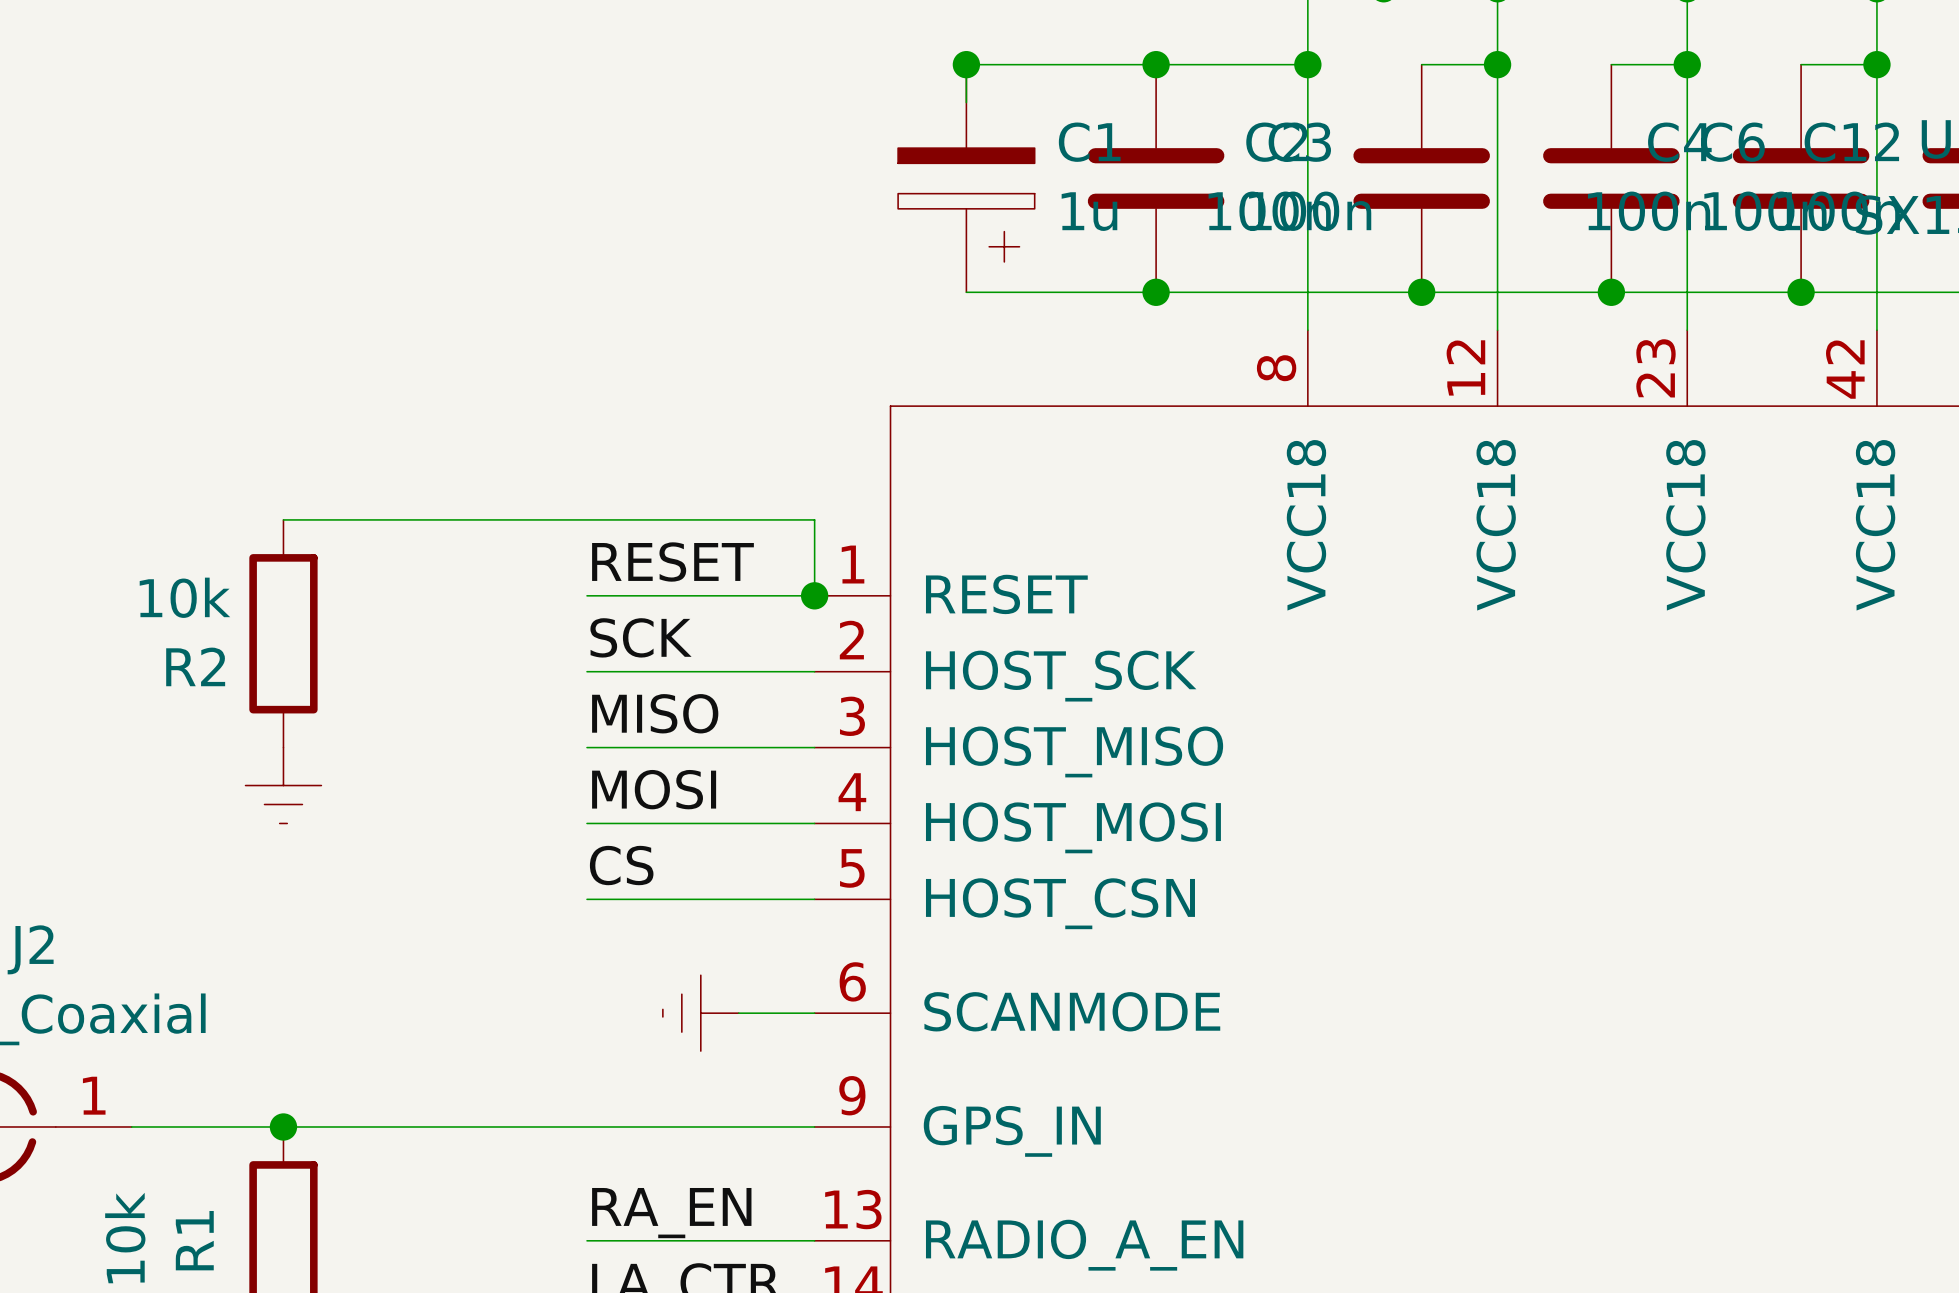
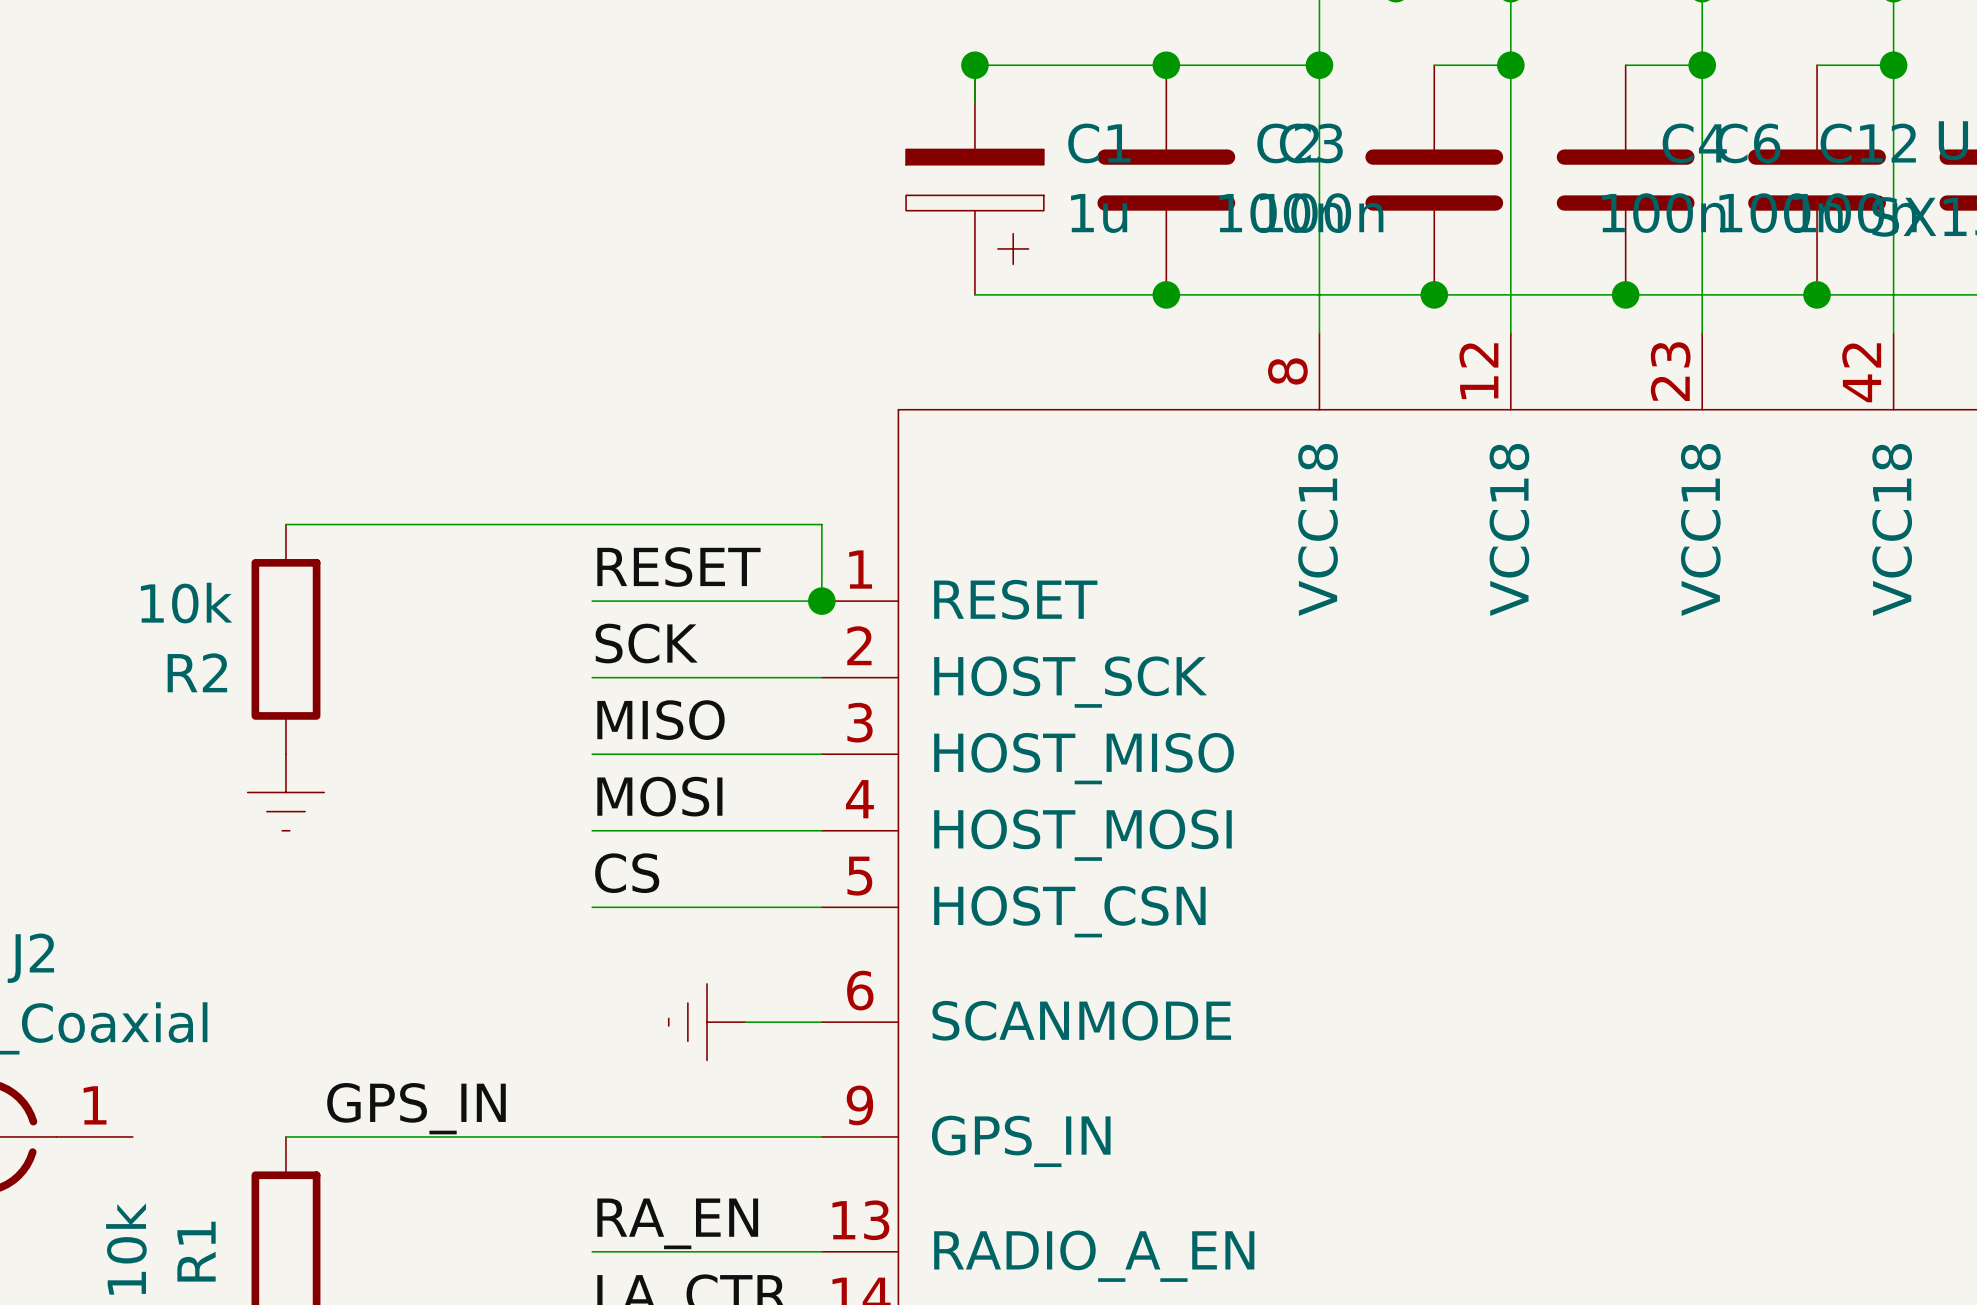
label: none -> GPS_IN (416, 1108)
wire: (131, 1126) (283, 1126) -> none
junction: (283, 1126) -> none

